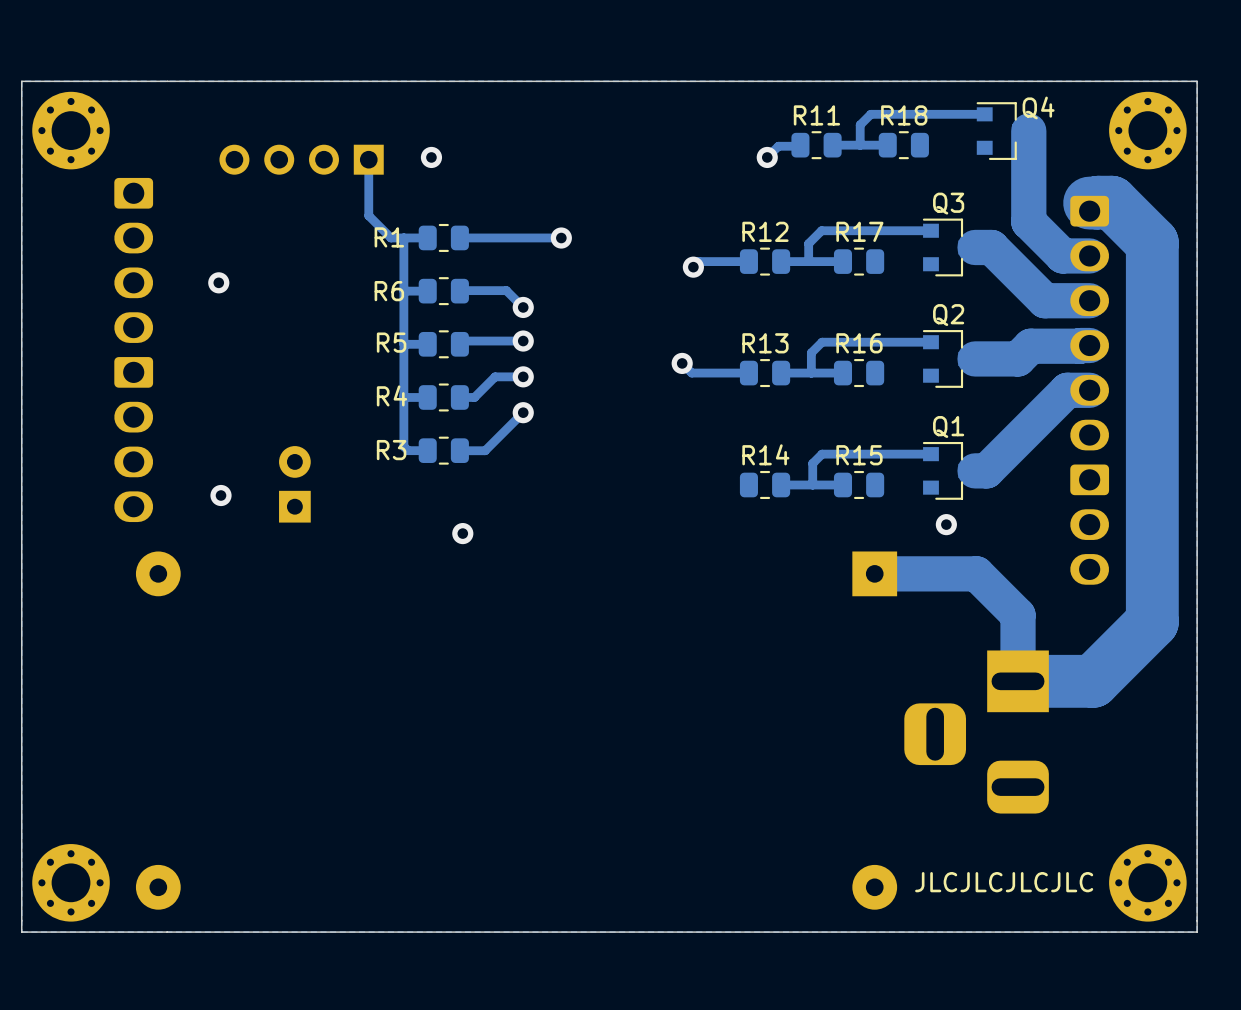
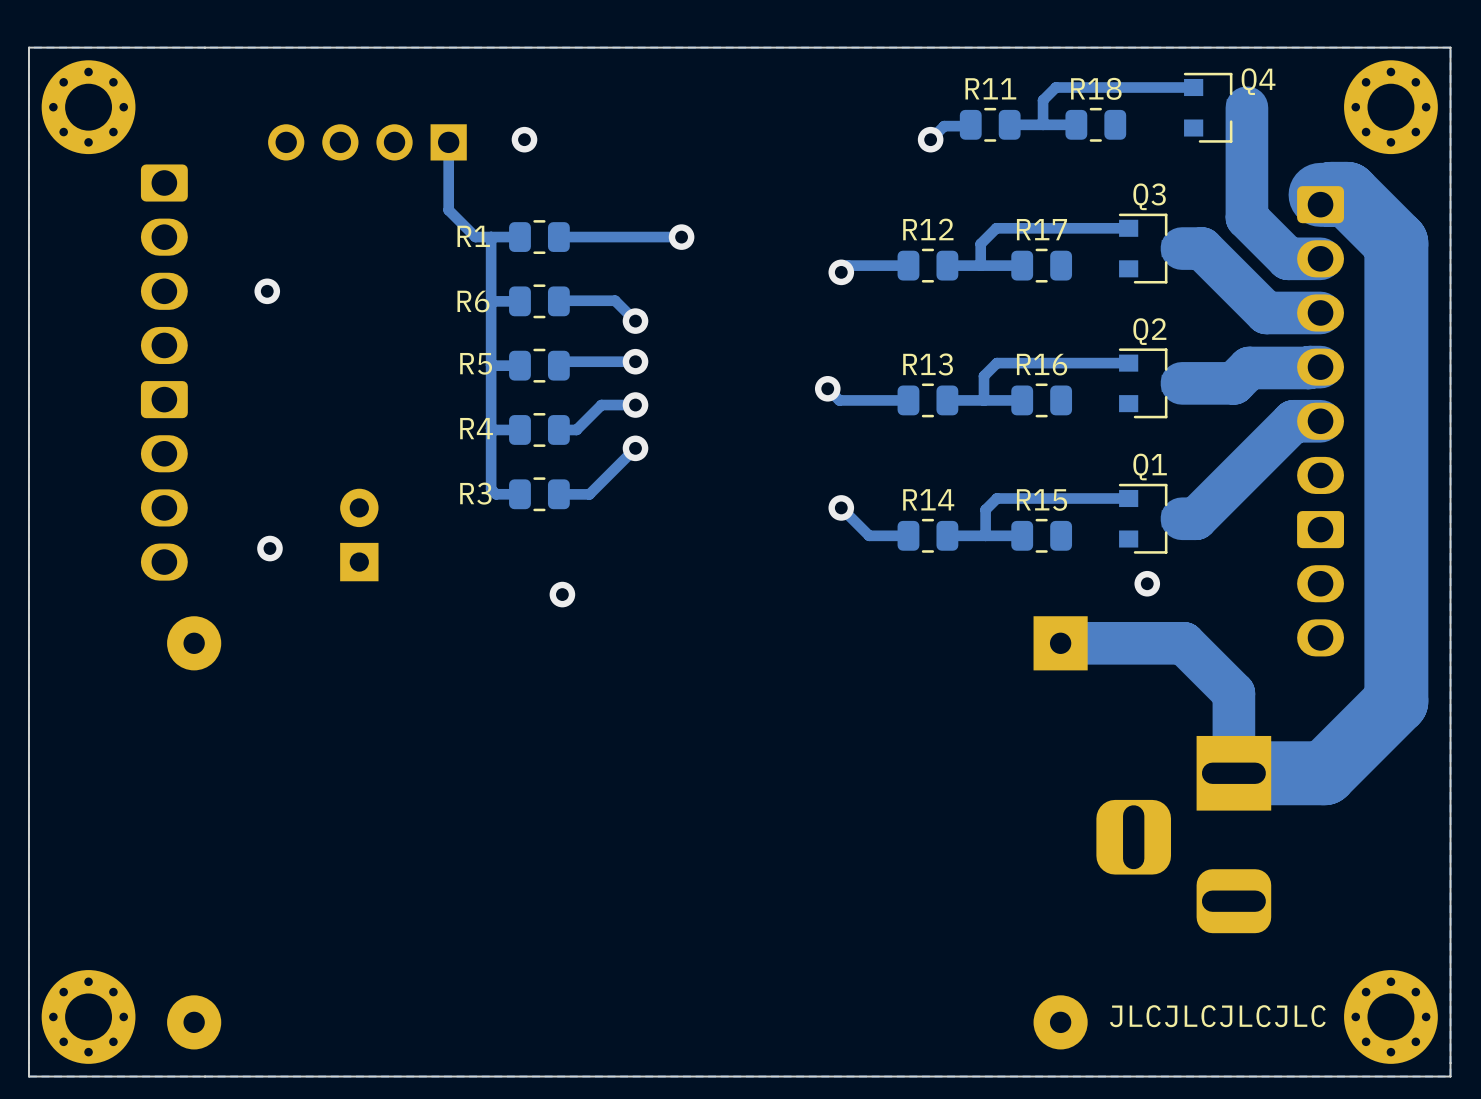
track: none -> (841, 507) (869, 535) (908, 535)
via: none -> (841, 507)

